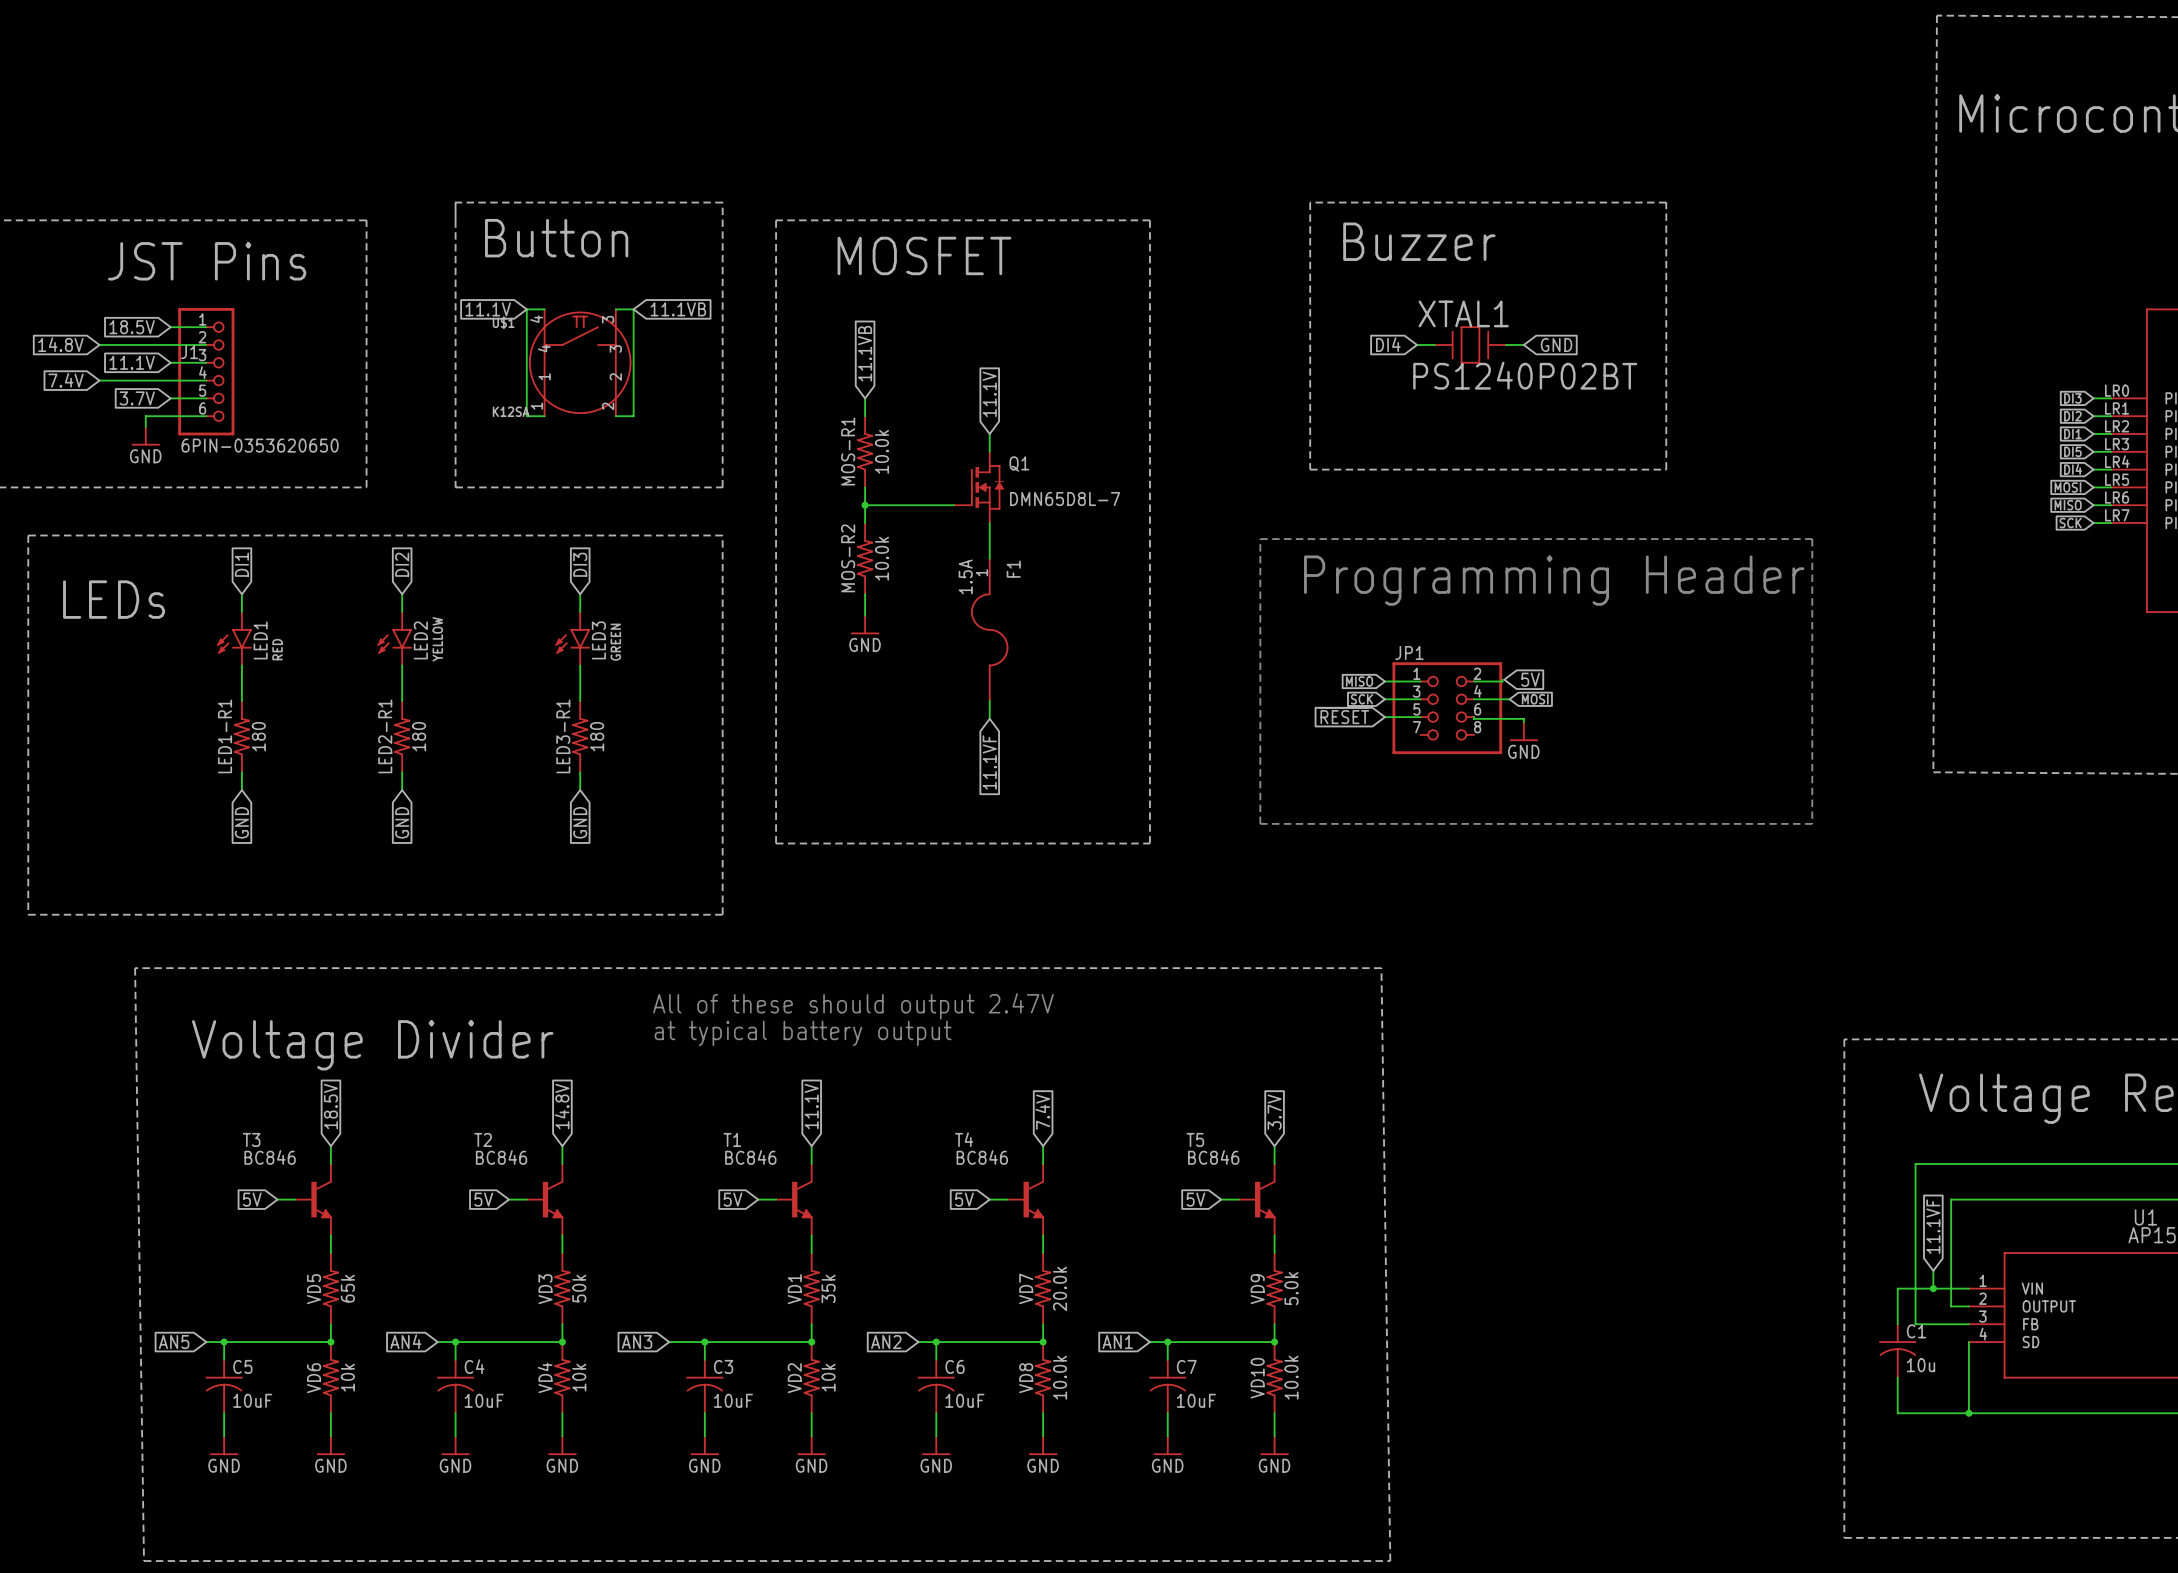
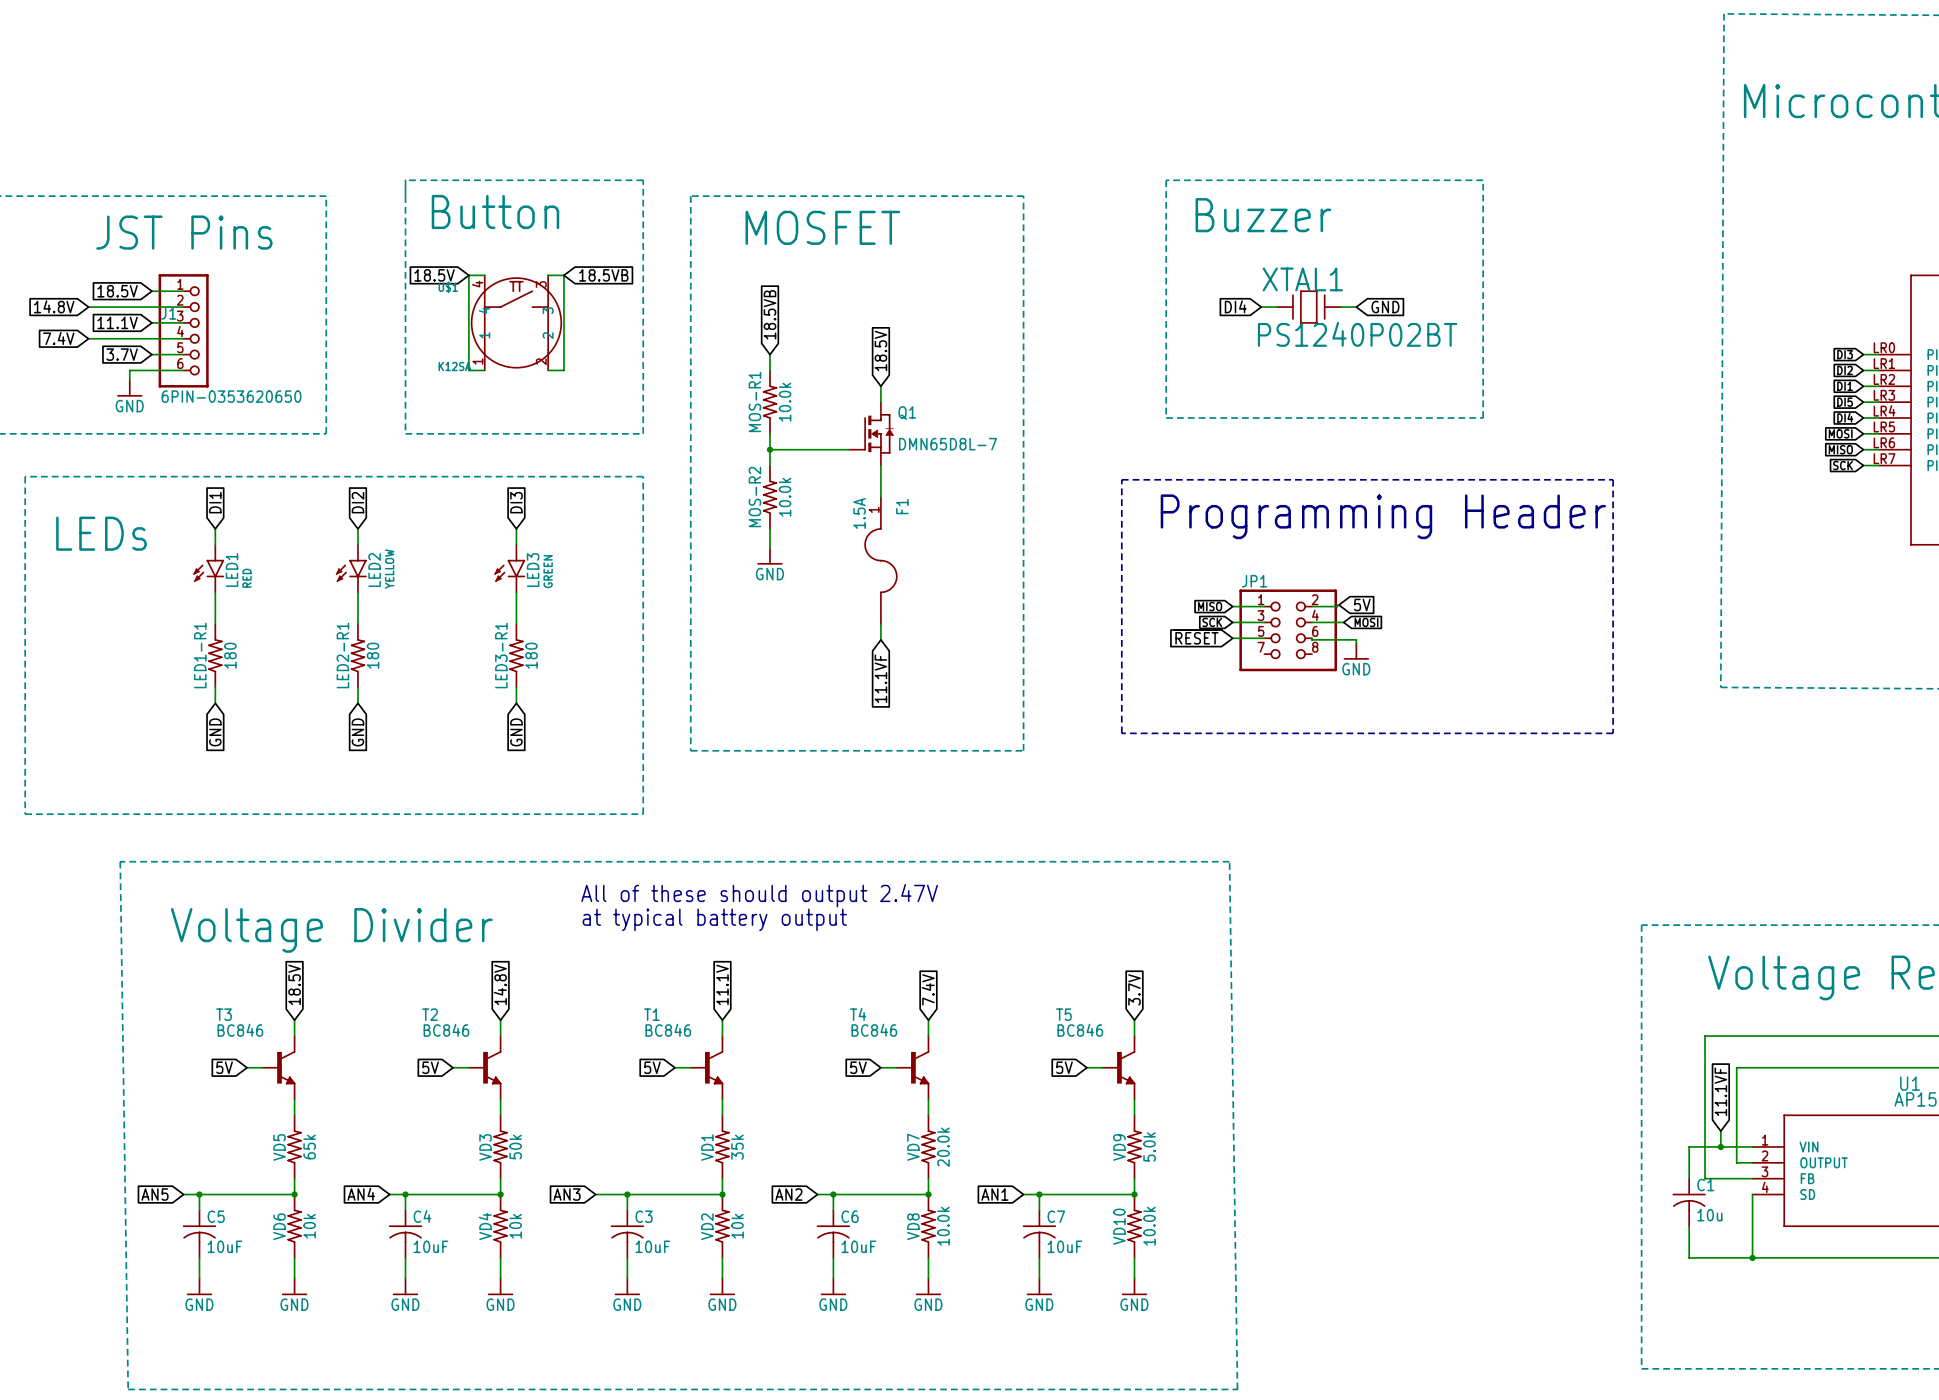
global label: 11.1V (488, 309) -> 18.5V (434, 275)
global label: 11.1VB (678, 309) -> 18.5VB (603, 275)
global label: 11.1VB (865, 353) -> 18.5VB (770, 314)
global label: 11.1V (989, 394) -> 18.5V (880, 351)

